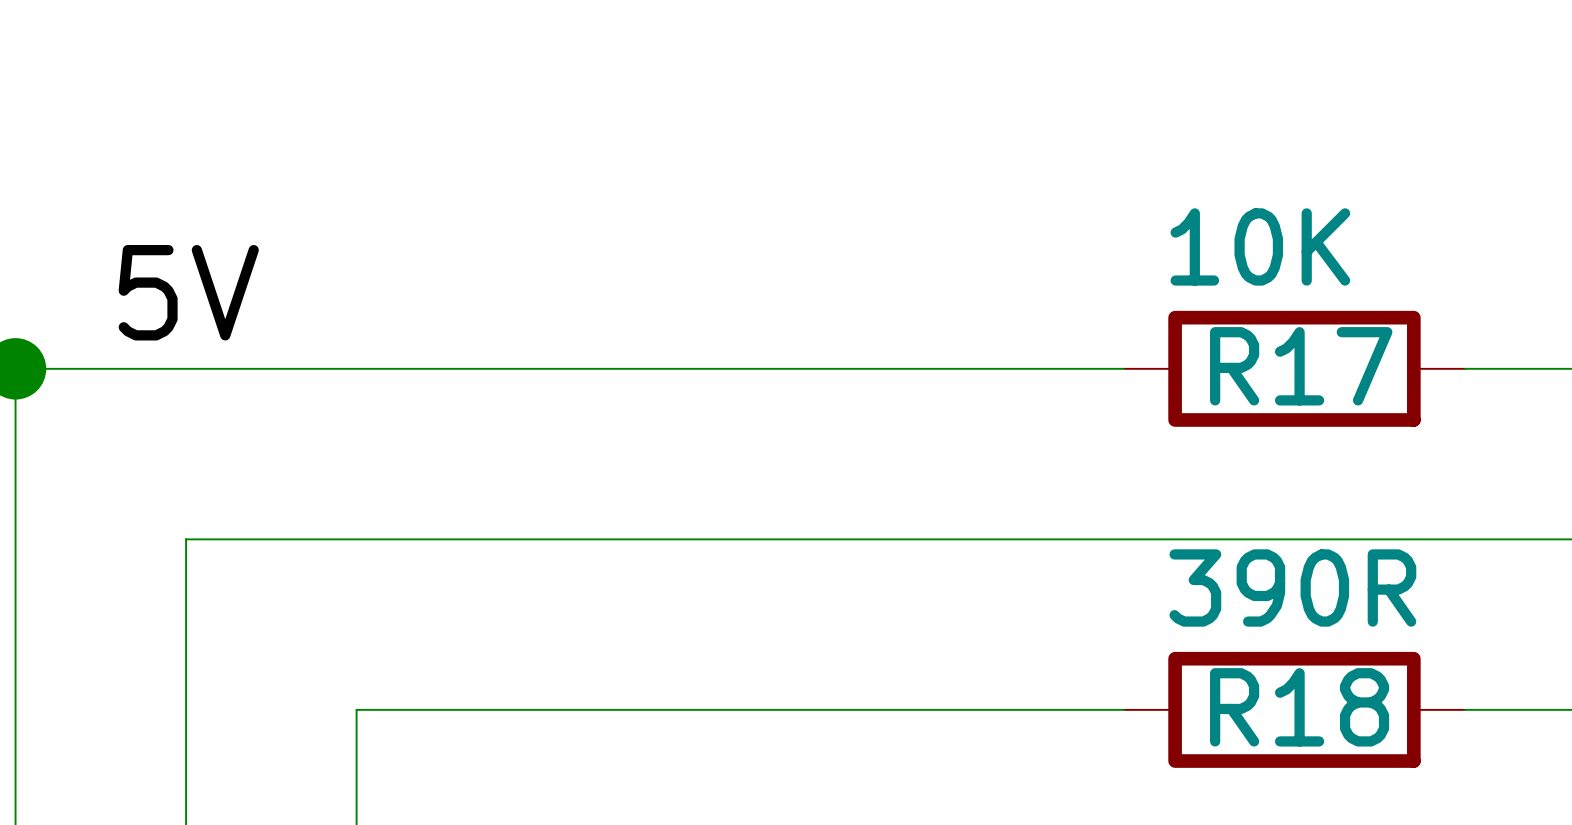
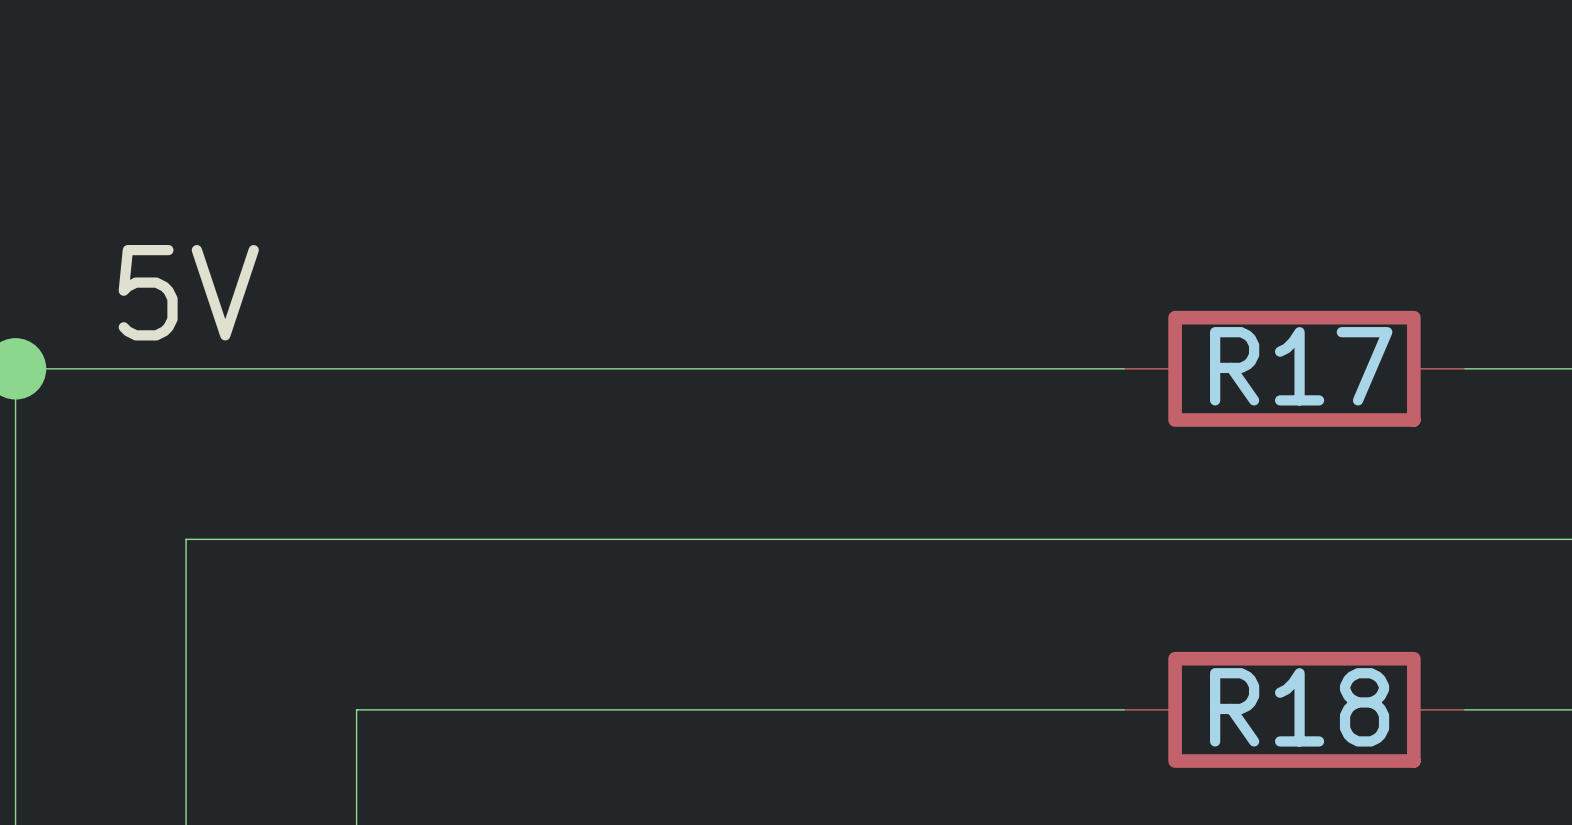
R17 value: 10K (1260, 246) -> none
R18 value: 390R (1292, 588) -> none

